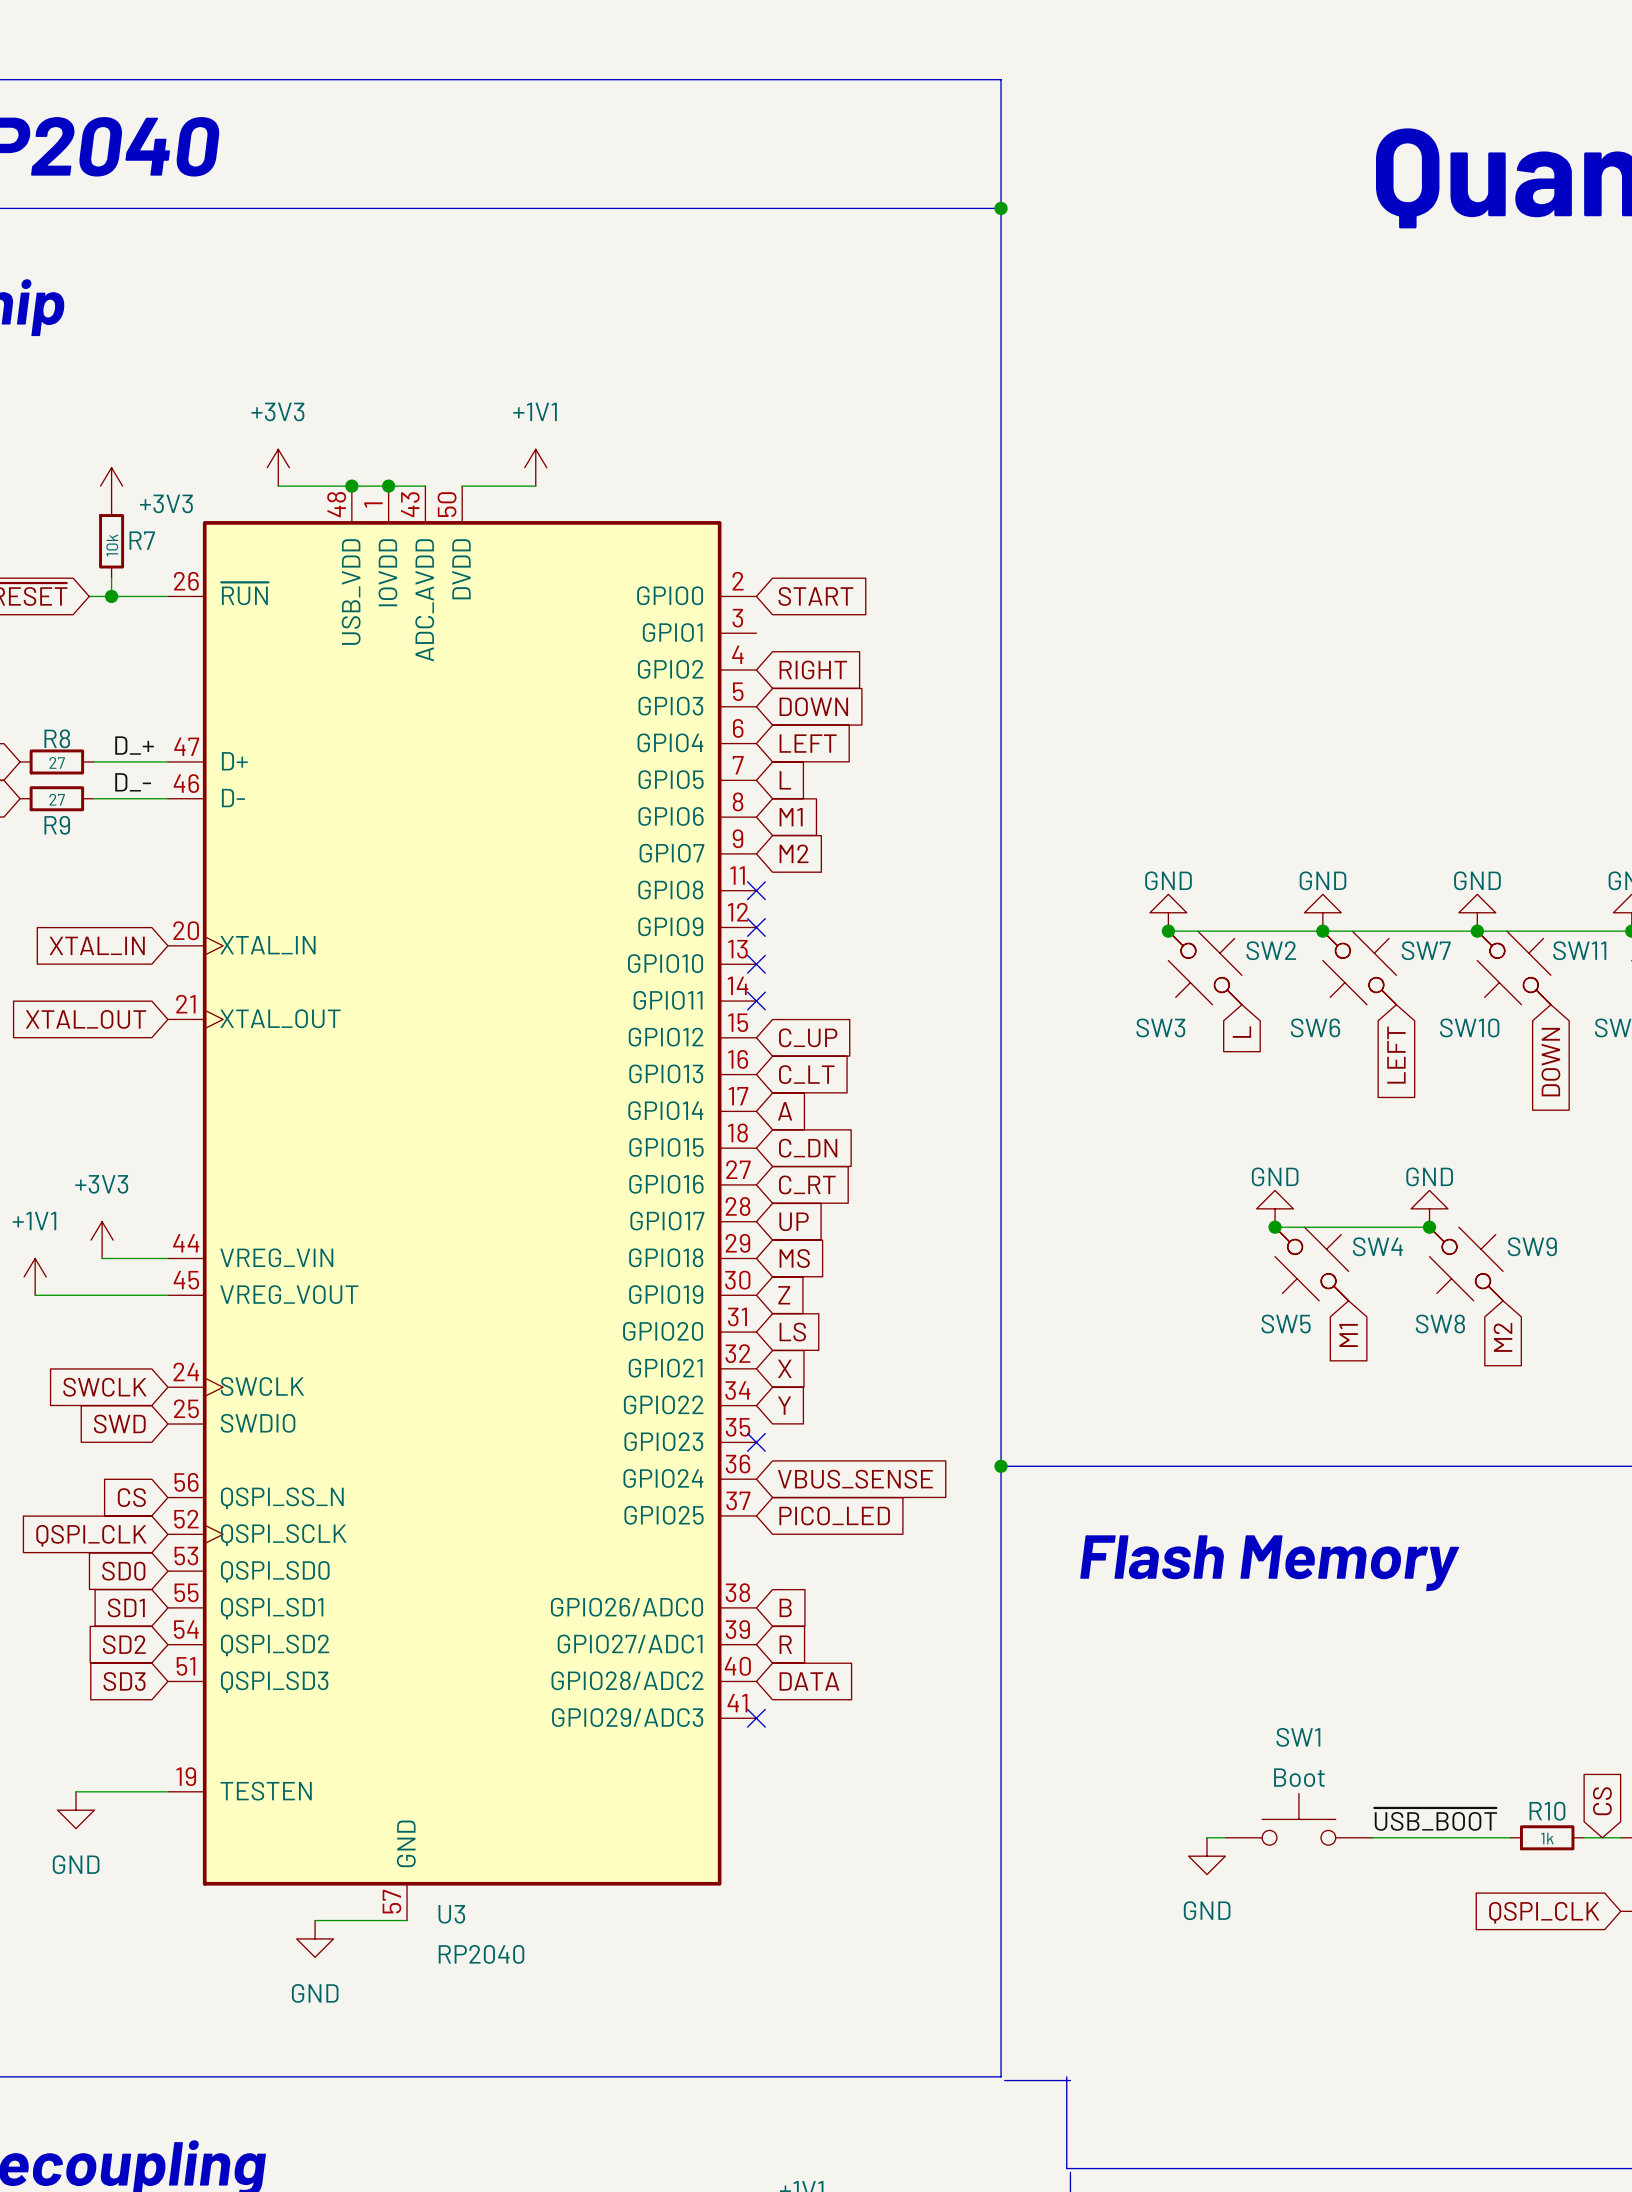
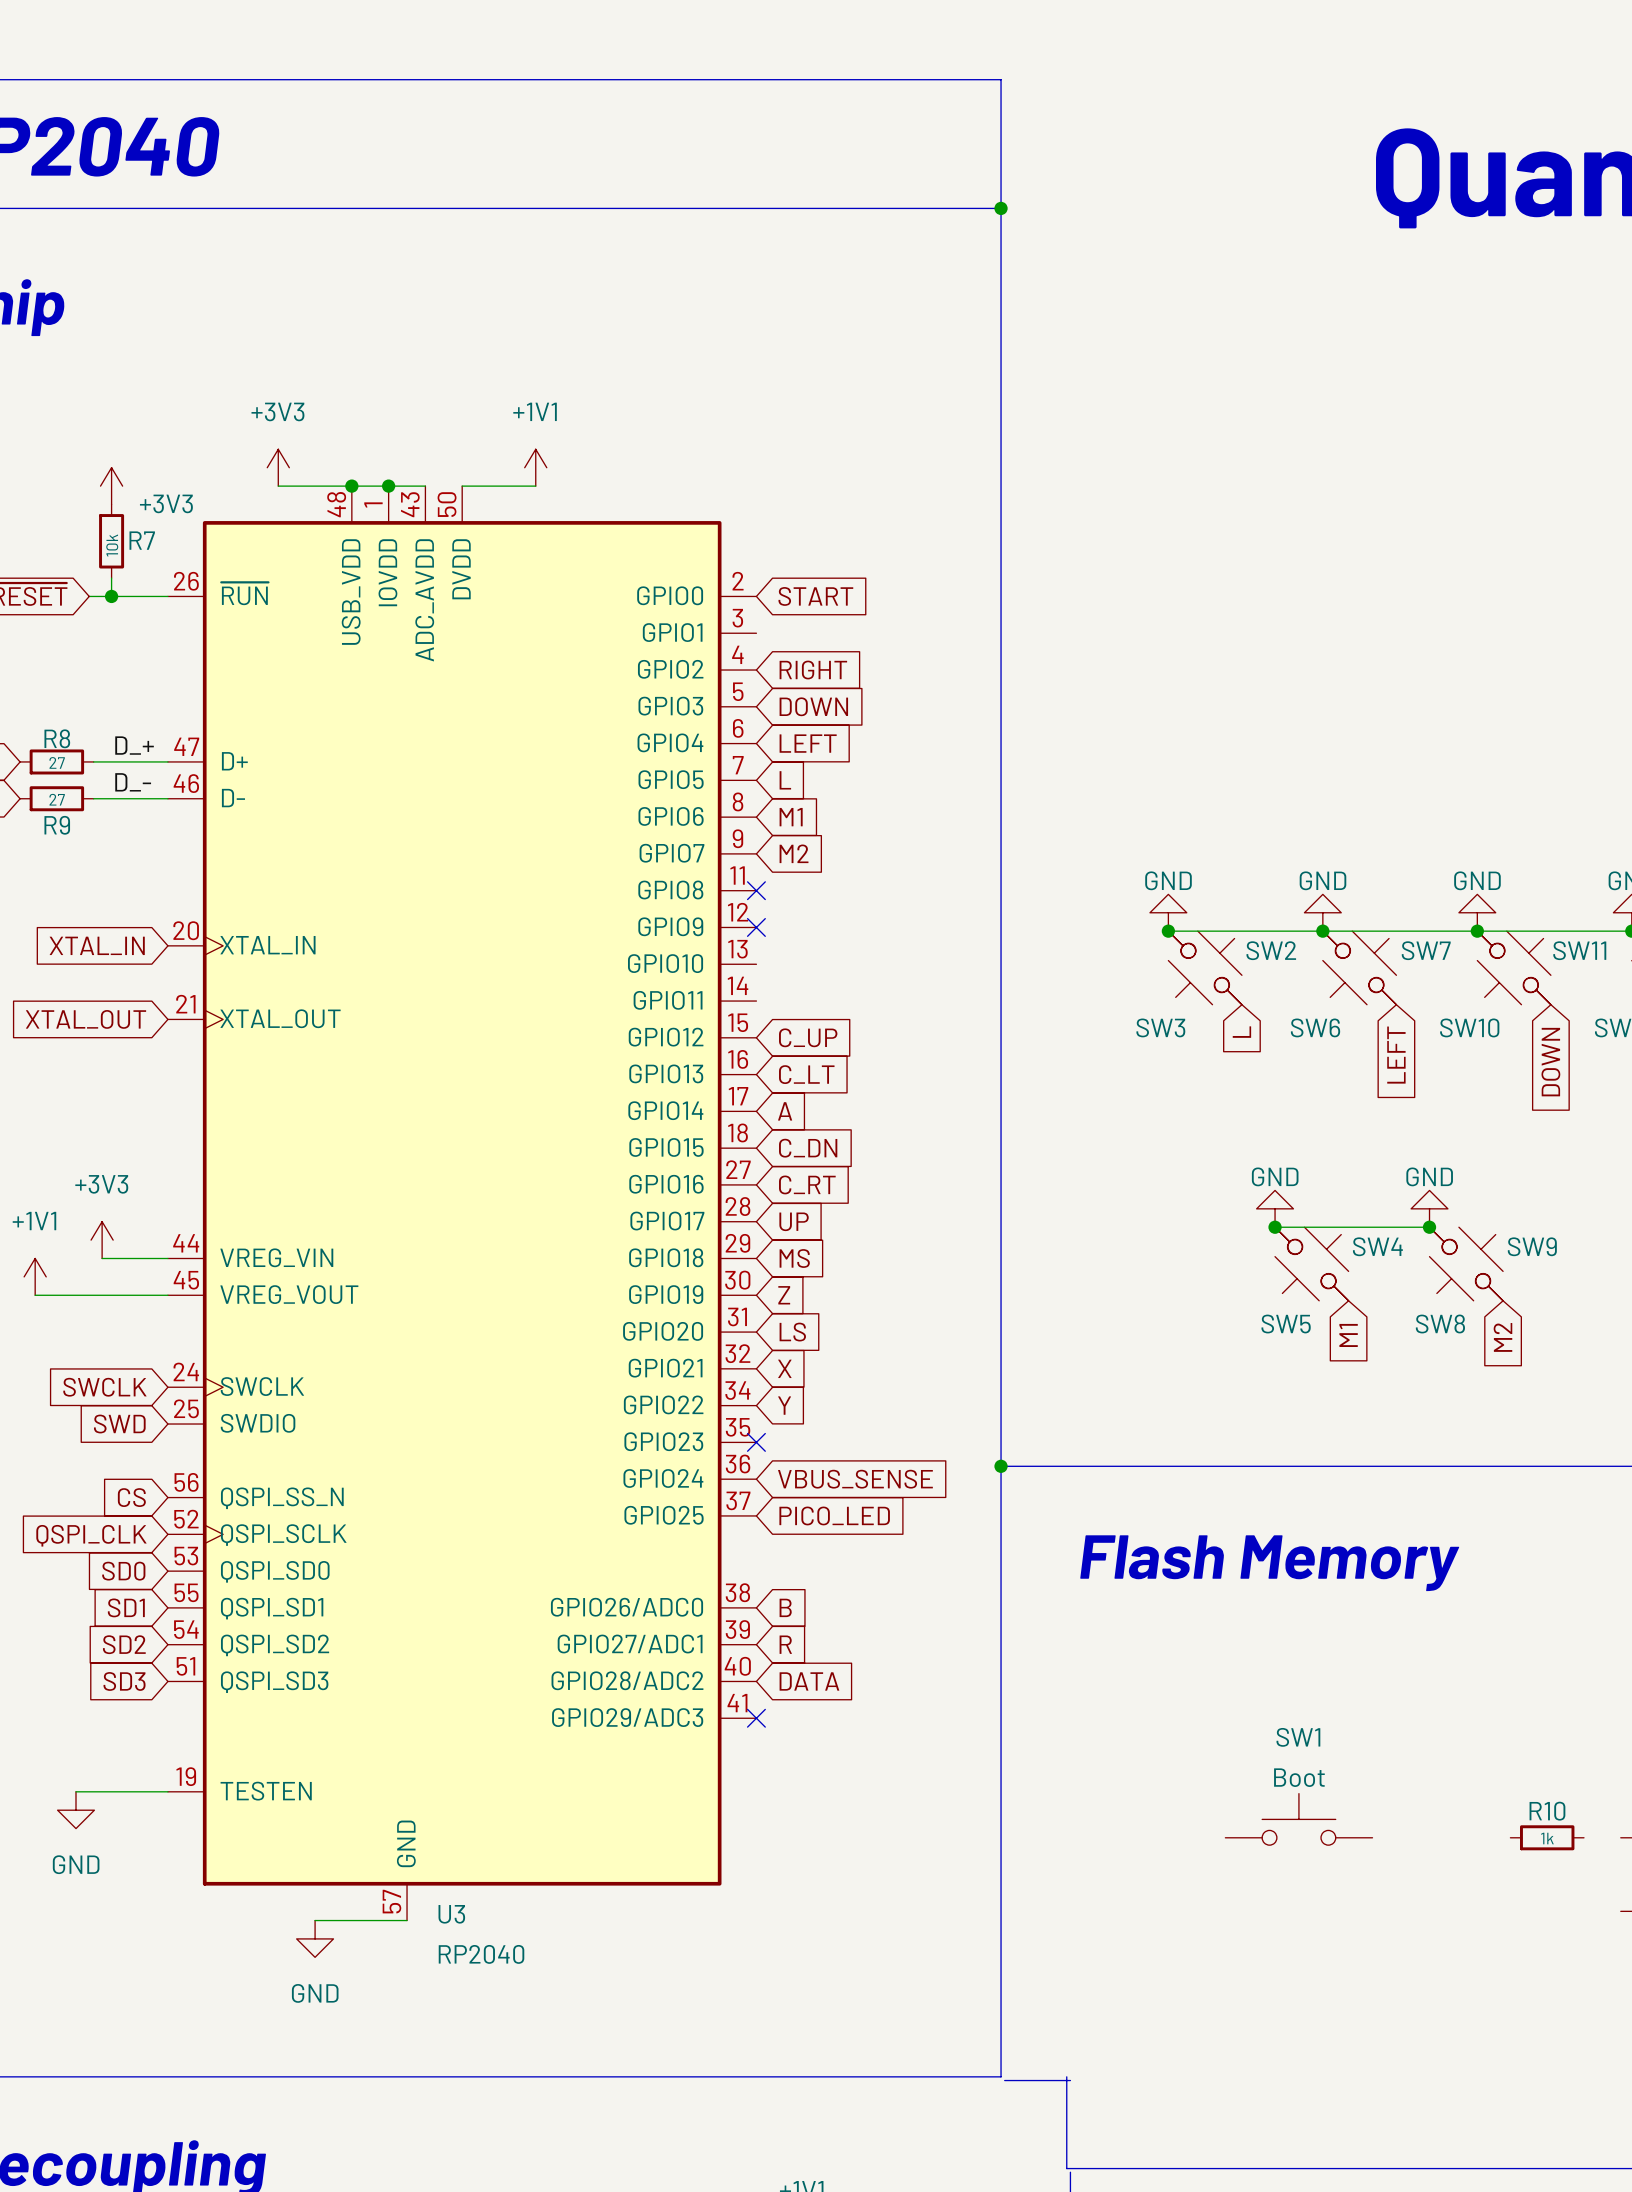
no-connect mark: (756, 964) -> none
no-connect mark: (756, 1001) -> none
global label: CS (1602, 1801) -> none
label: ~{USB_BOOT} (1435, 1819) -> none
wire: (1206, 1837) (1225, 1837) -> none
wire: (1372, 1837) (1510, 1837) -> none
wire: (1583, 1837) (1620, 1837) -> none
power symbol: GND (1206, 1856) -> none
global label: QSPI_CLK (1544, 1912) -> none

